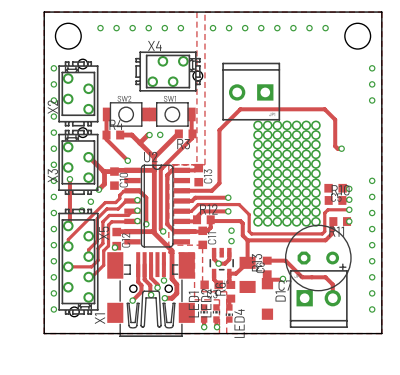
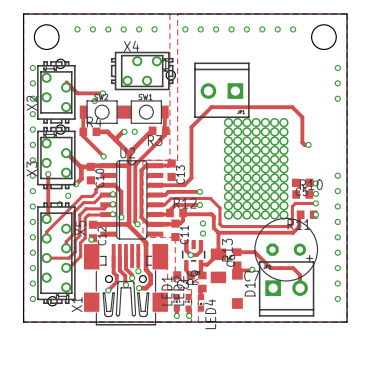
track: none -> (66, 82) (77, 93) (102, 93)
via: none -> (102, 93)
via: none -> (94, 100)

